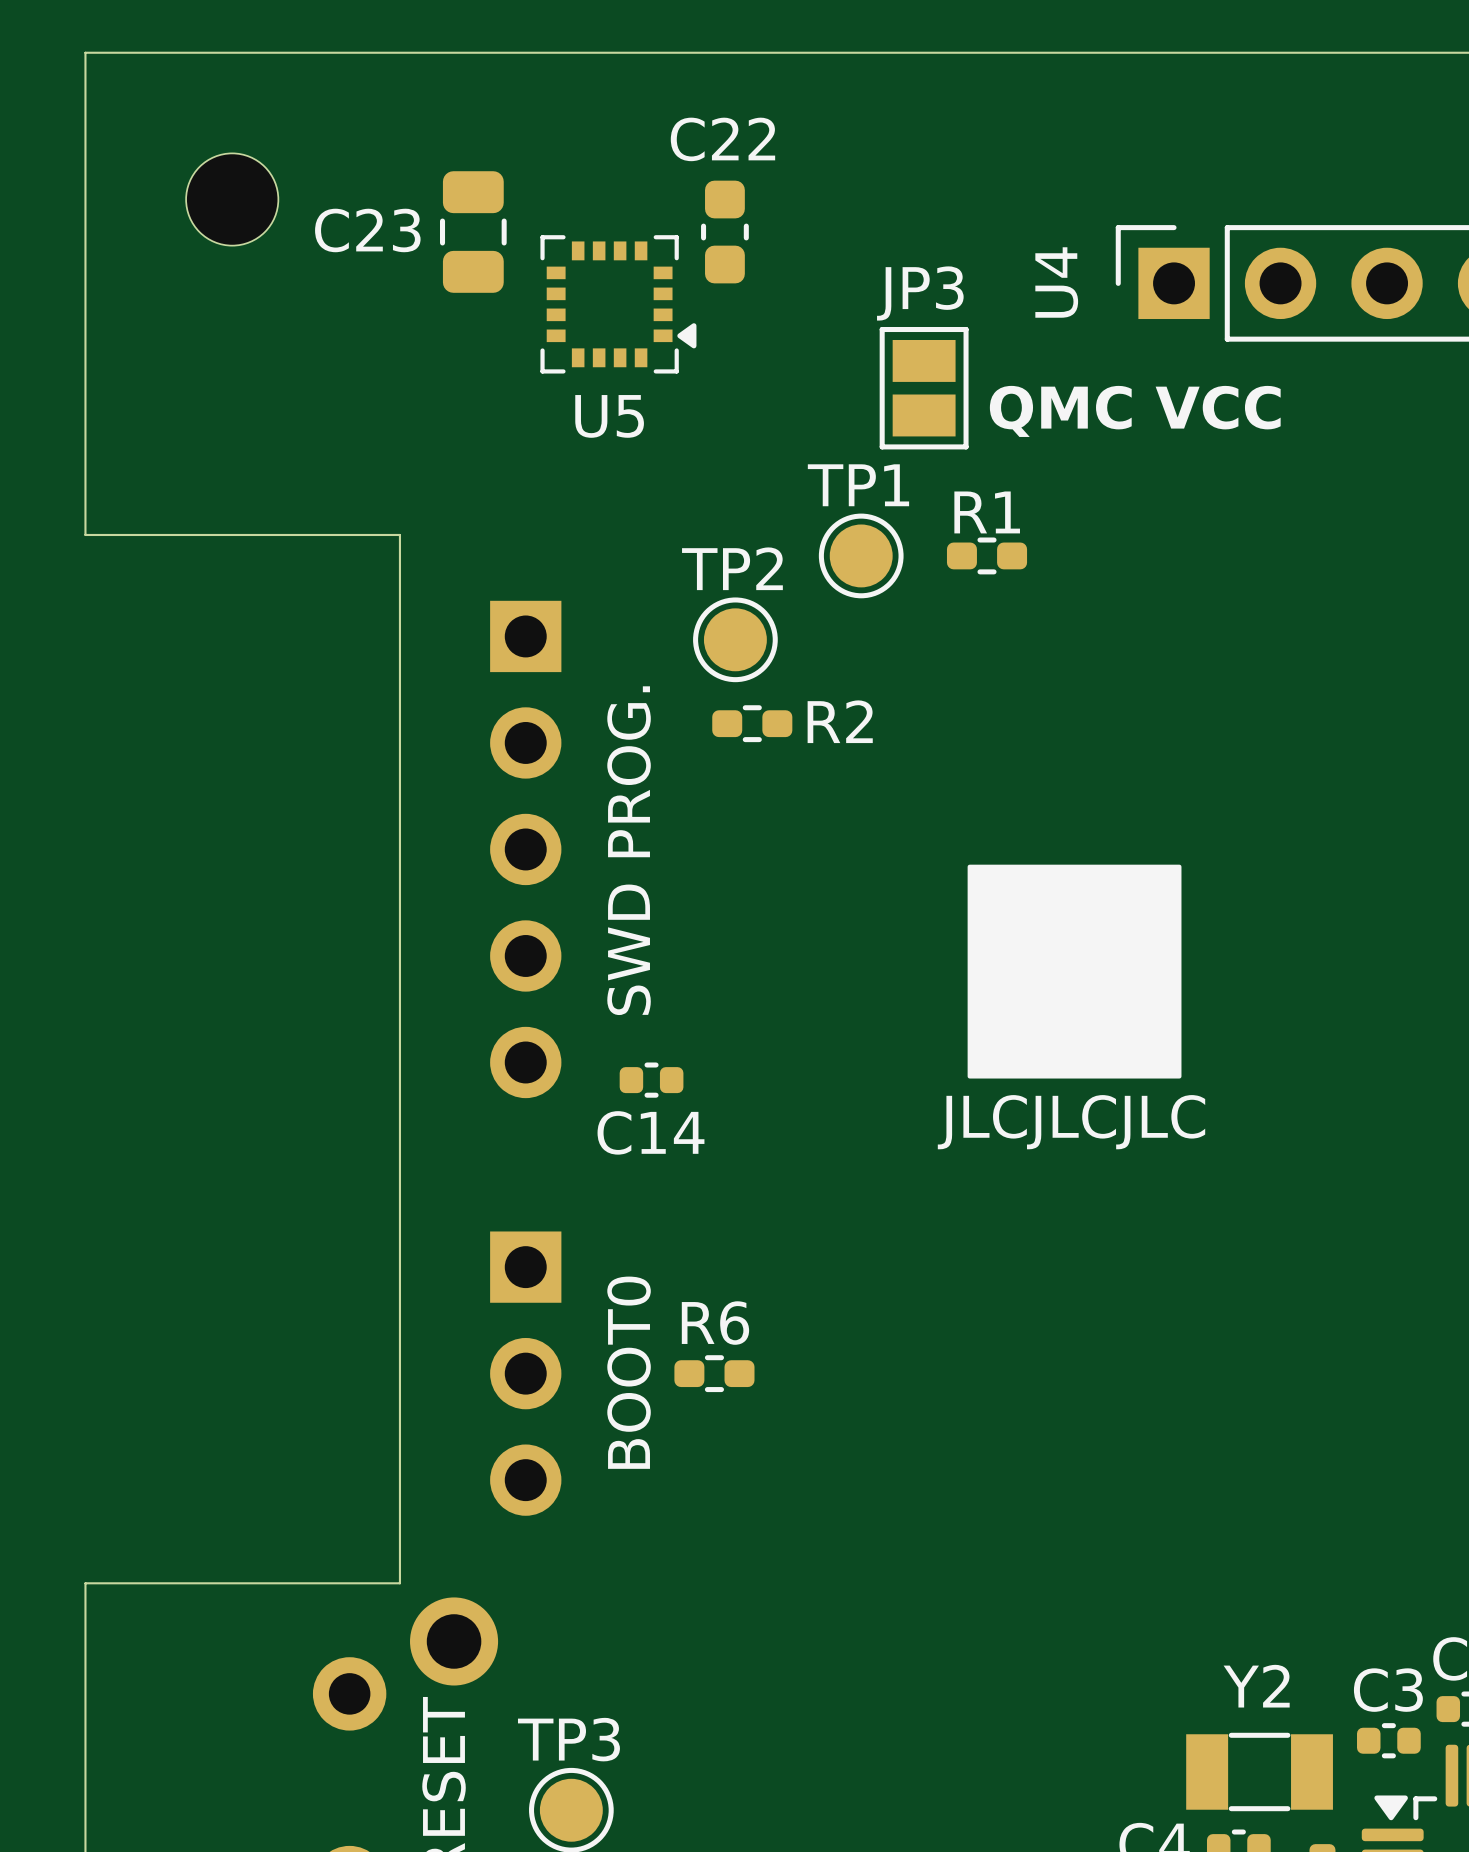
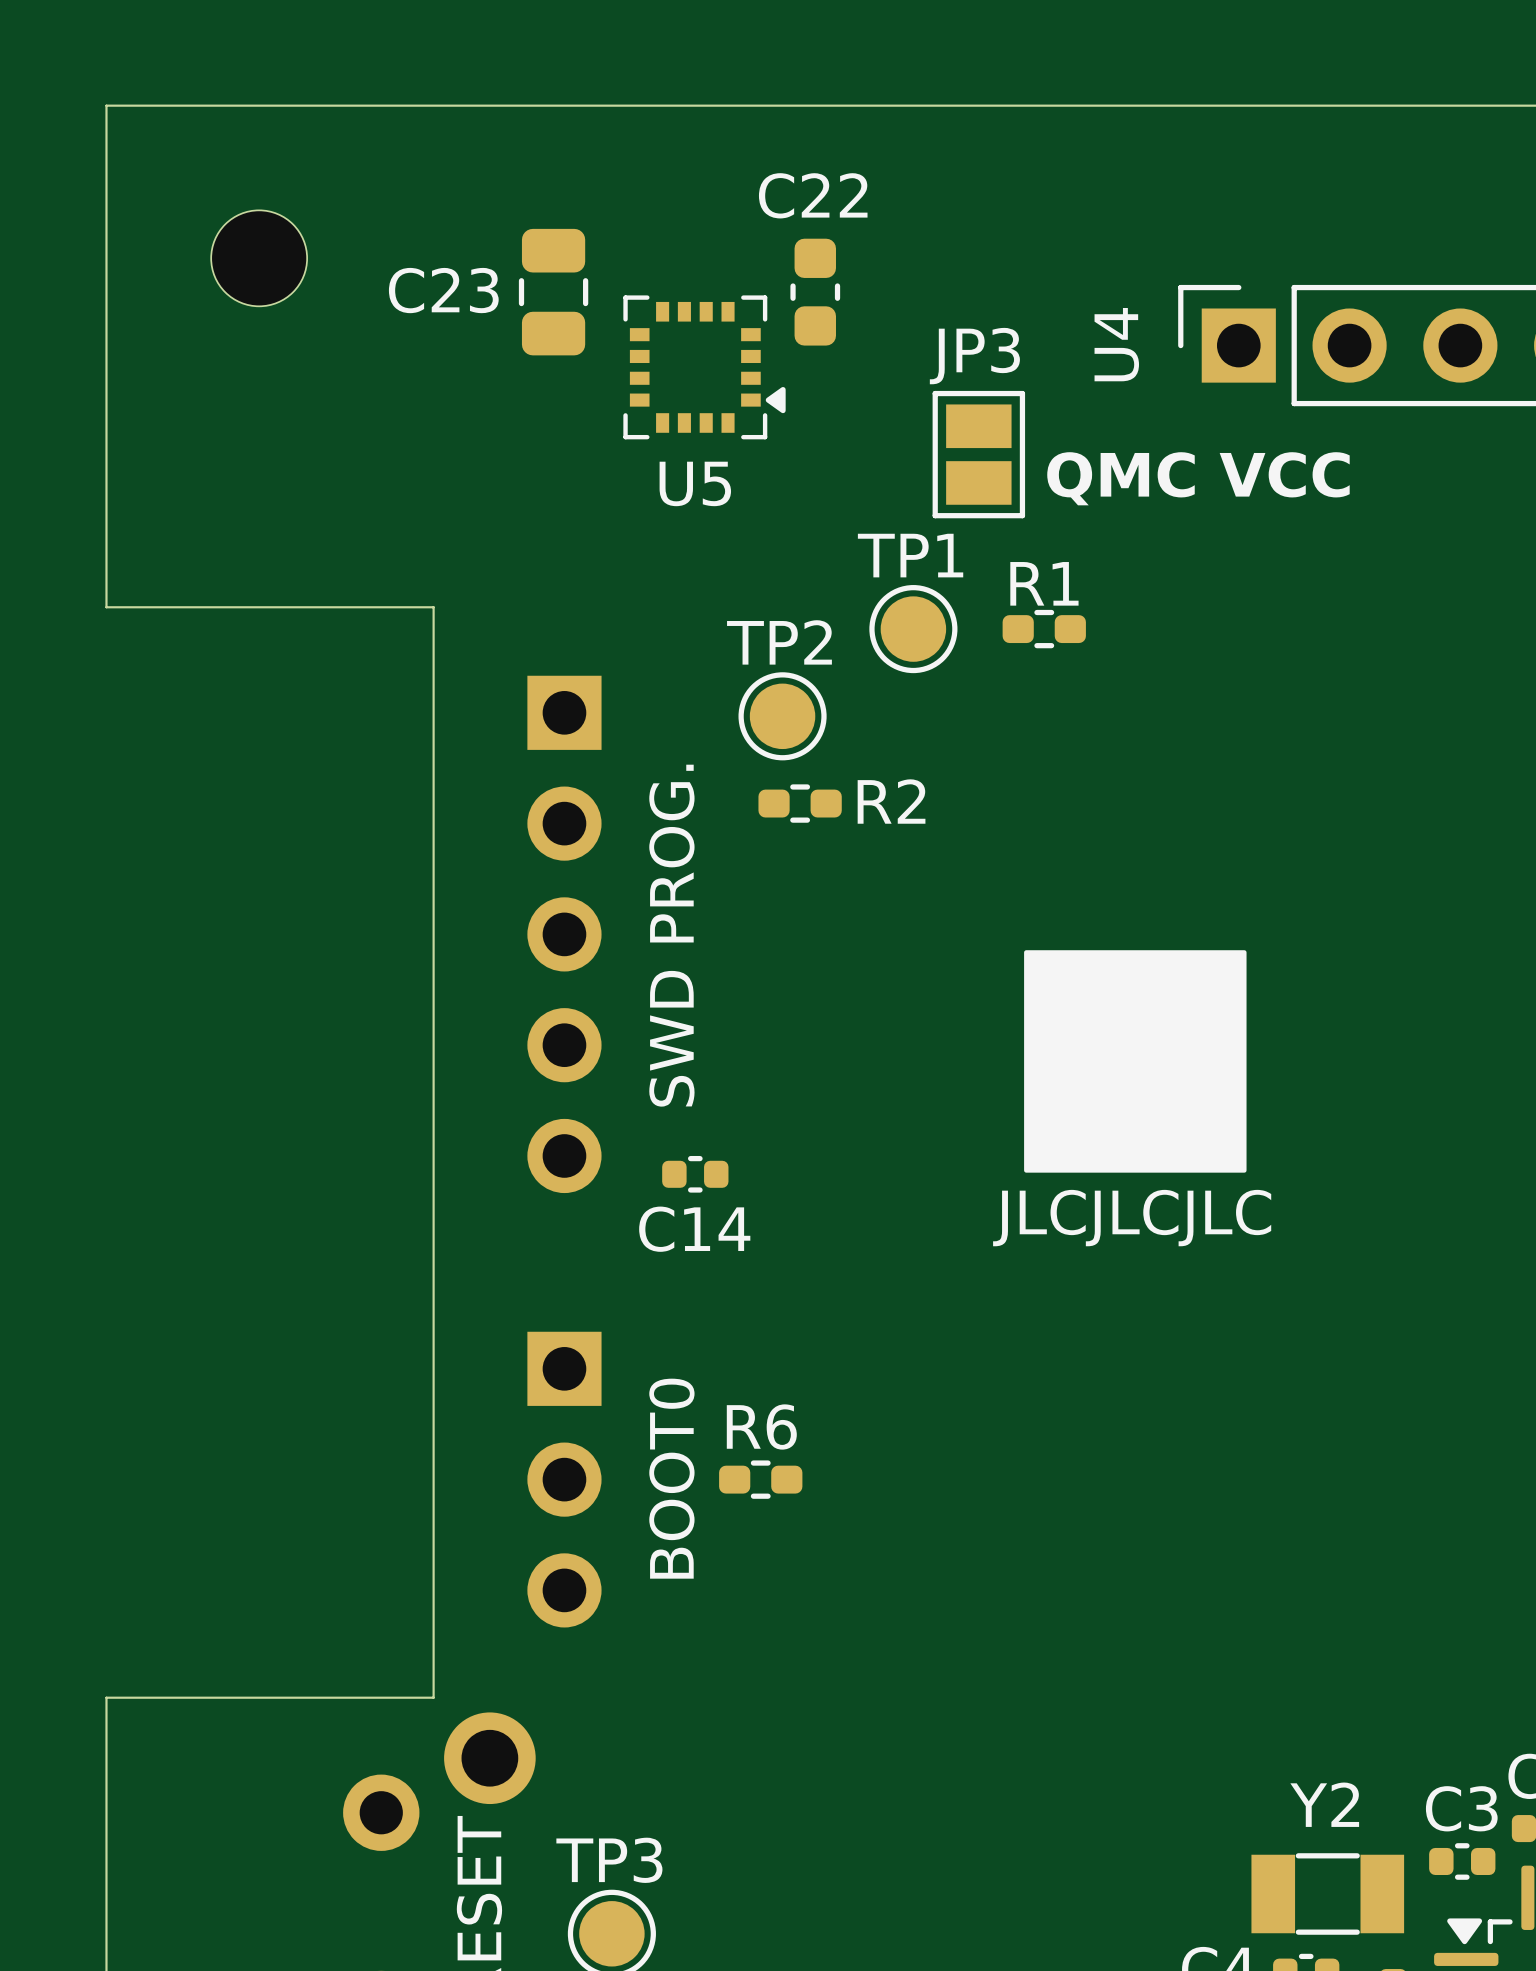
C23 position: (473, 232) -> (553, 292)
C22 position: (724, 232) -> (815, 292)
U5 position: (618, 304) -> (704, 367)

